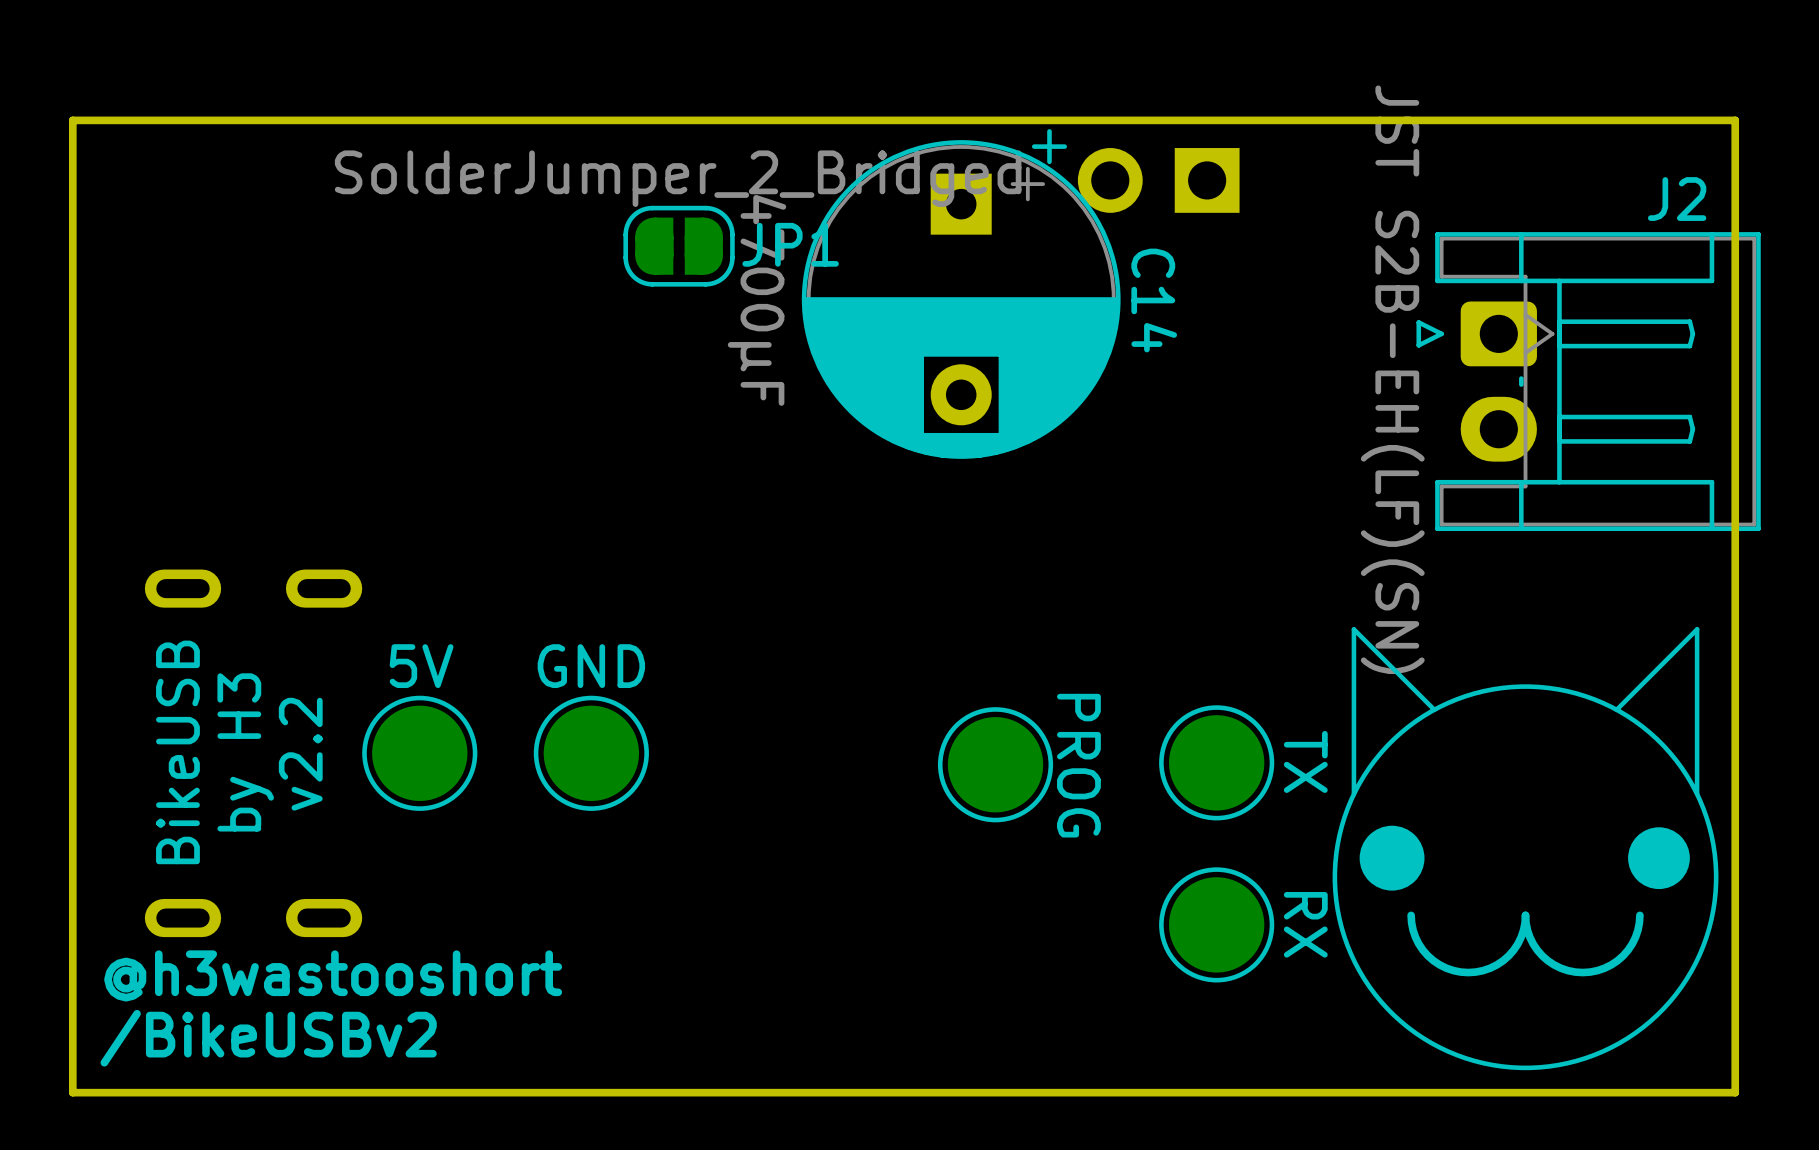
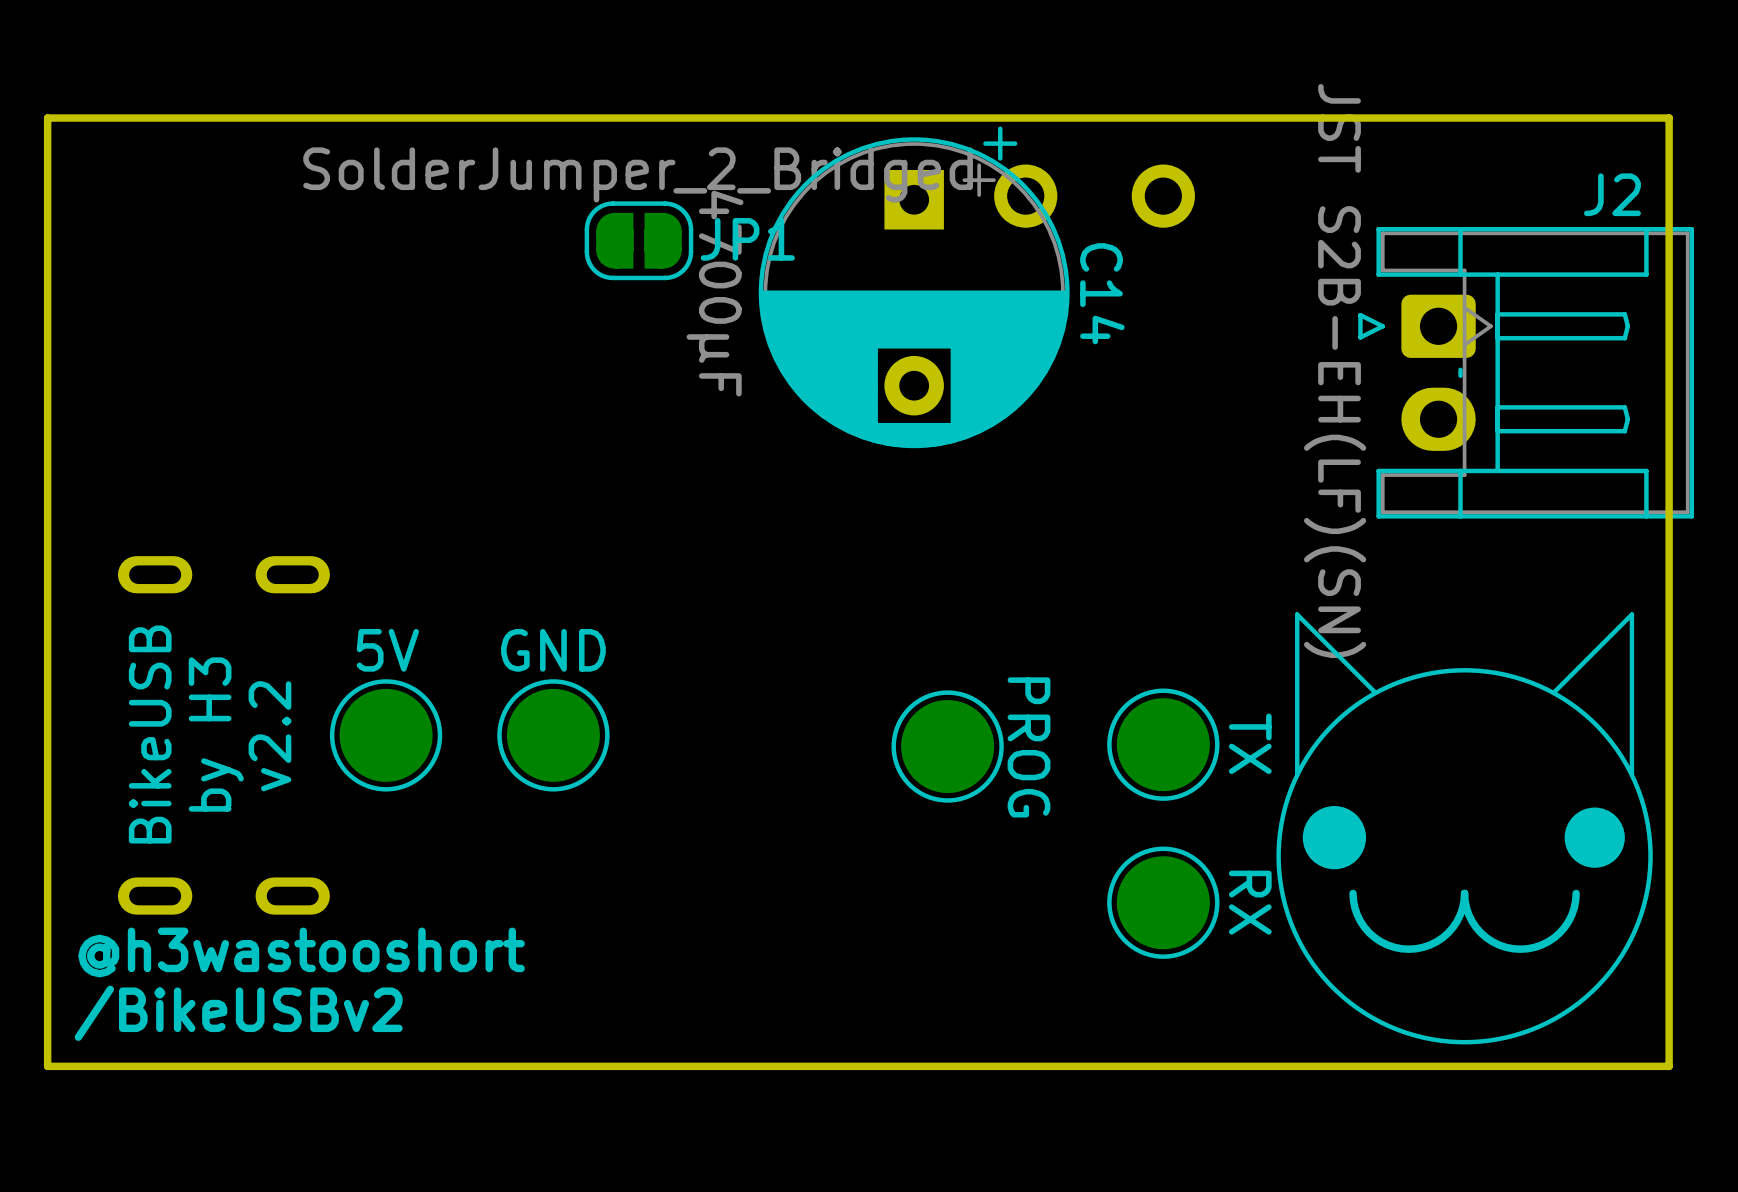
part footprint: [1077, 148, 1240, 213] -> [994, 164, 1195, 228]

